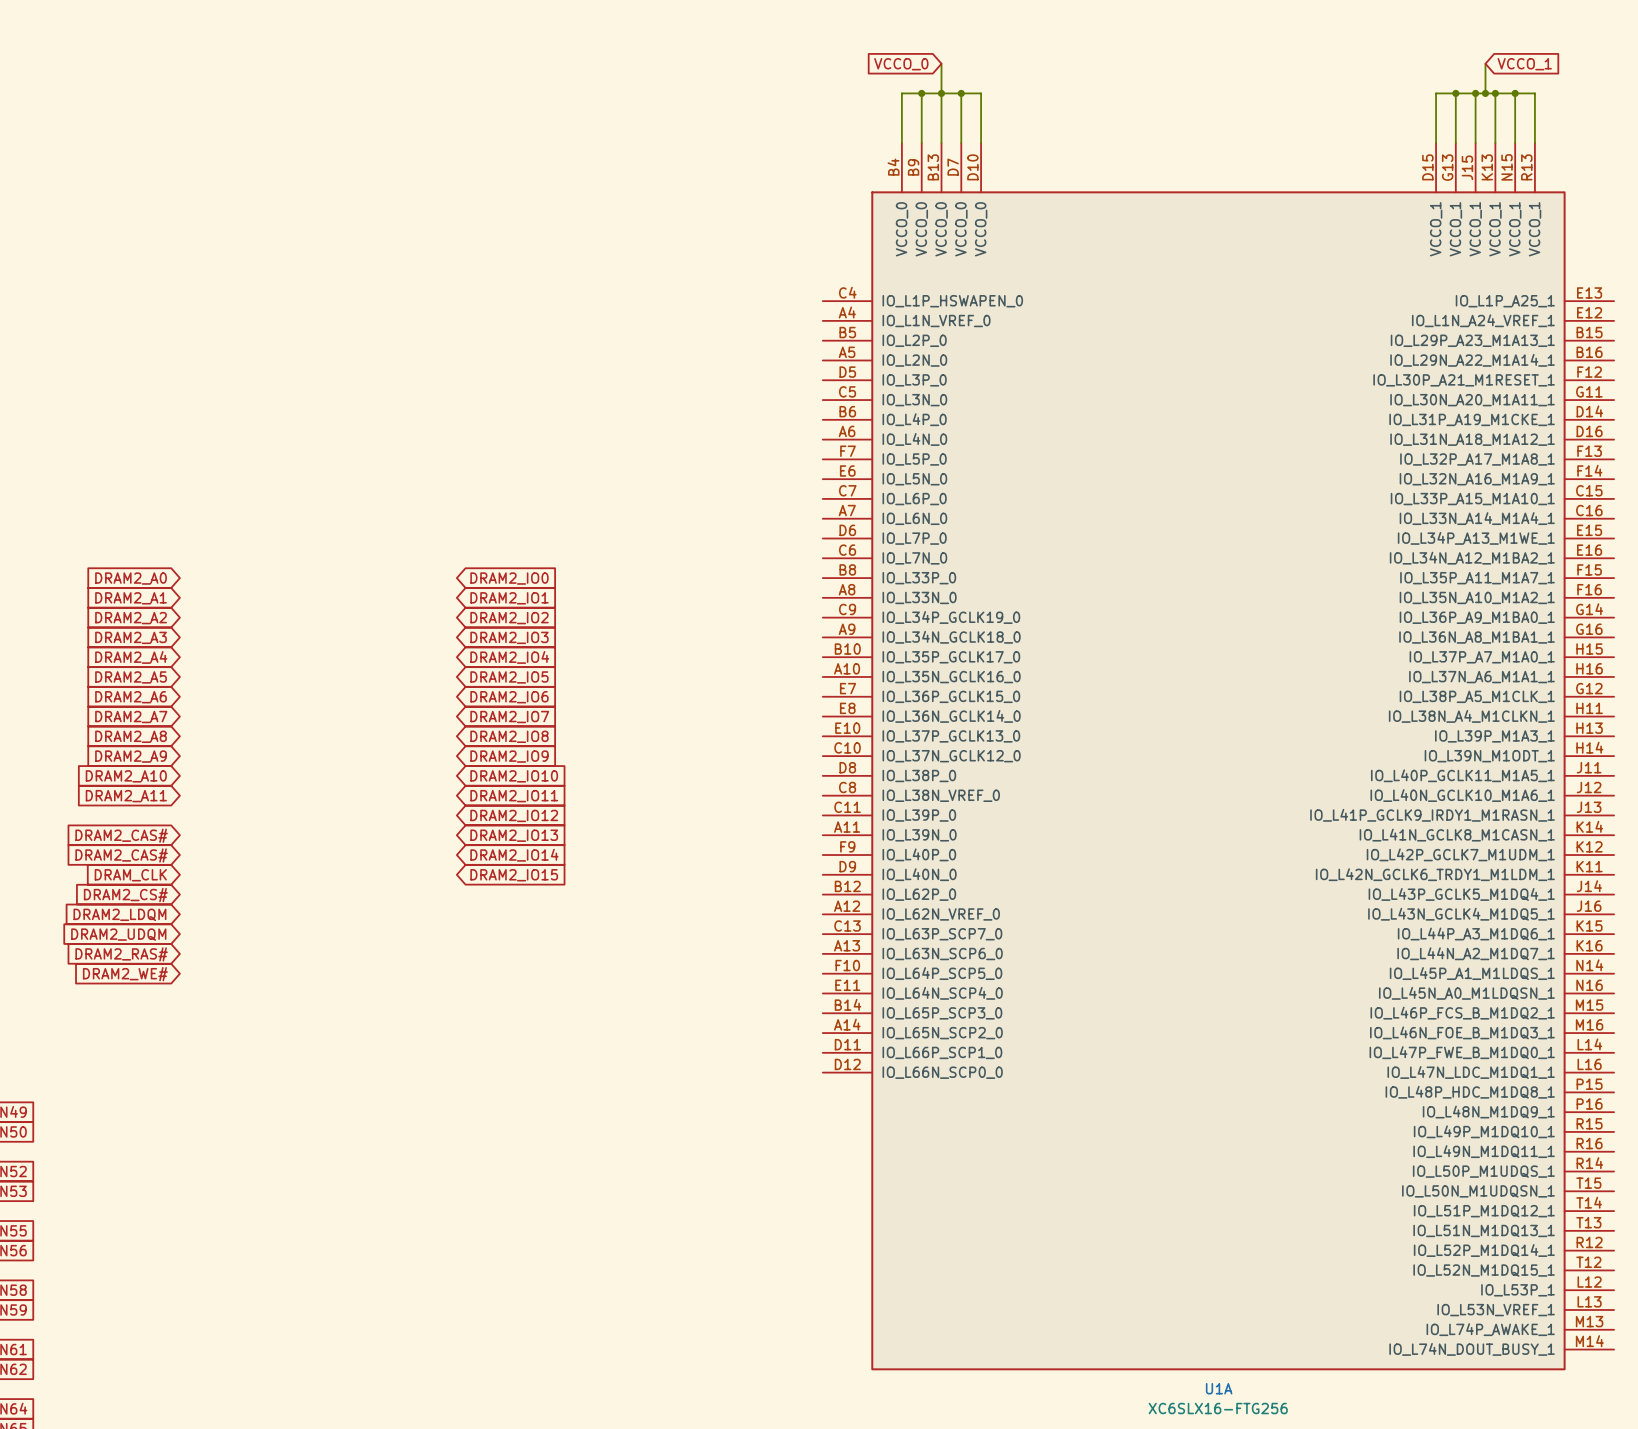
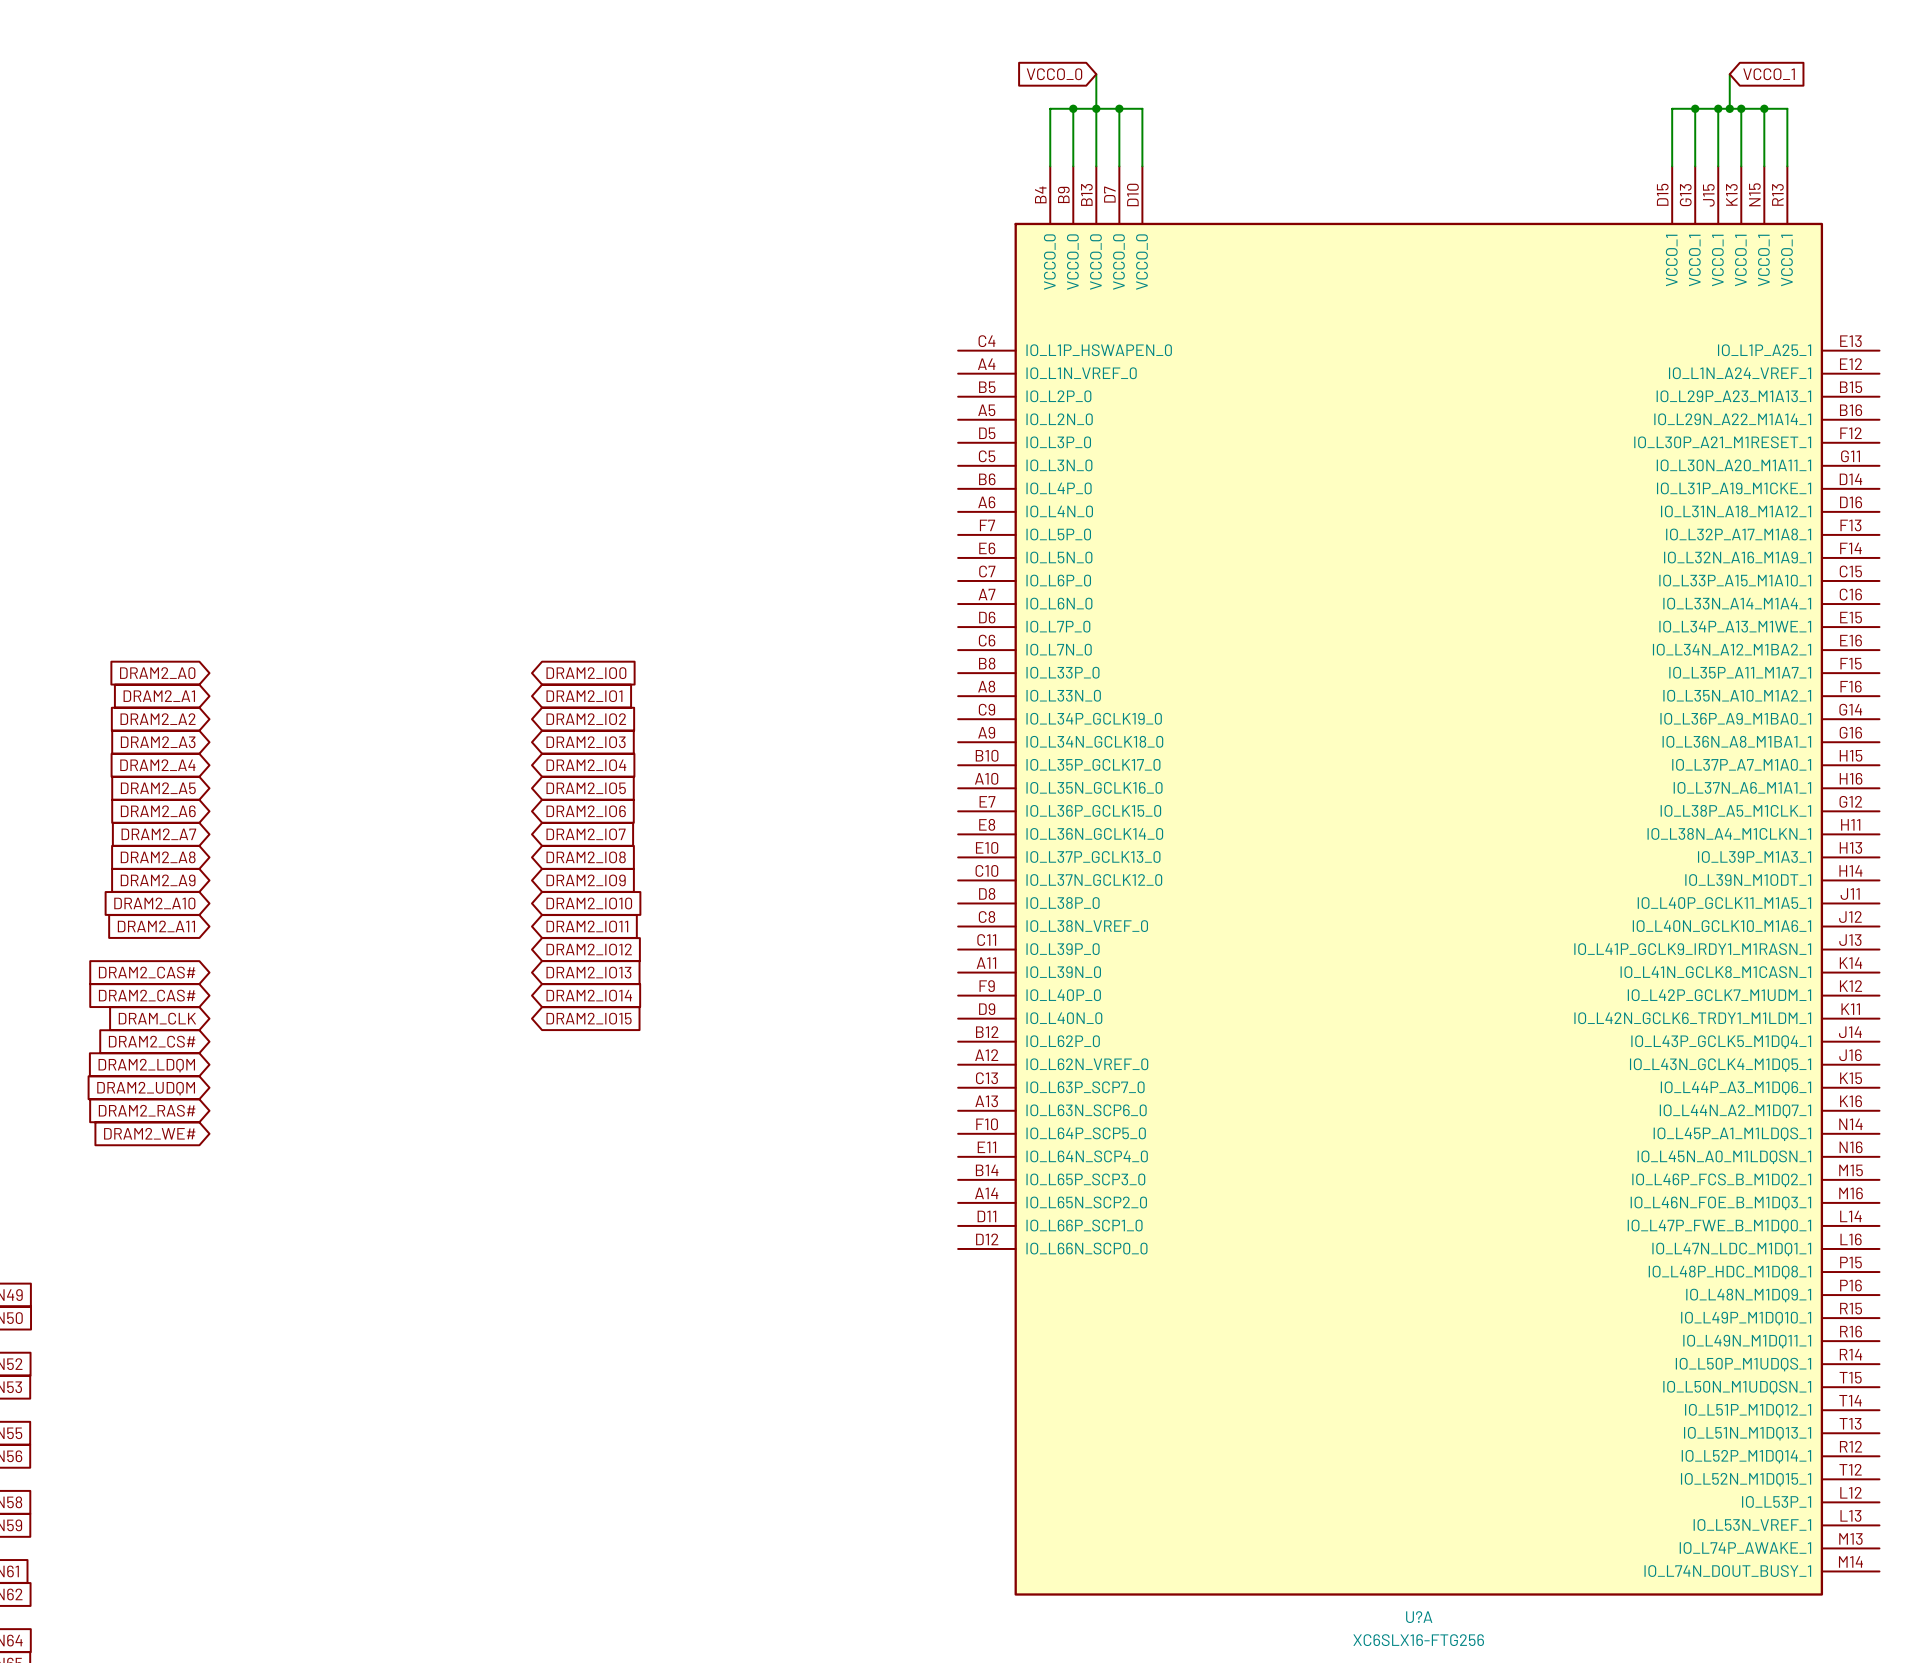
U1A name: U1A (1219, 1388) -> U?A (1419, 1617)

